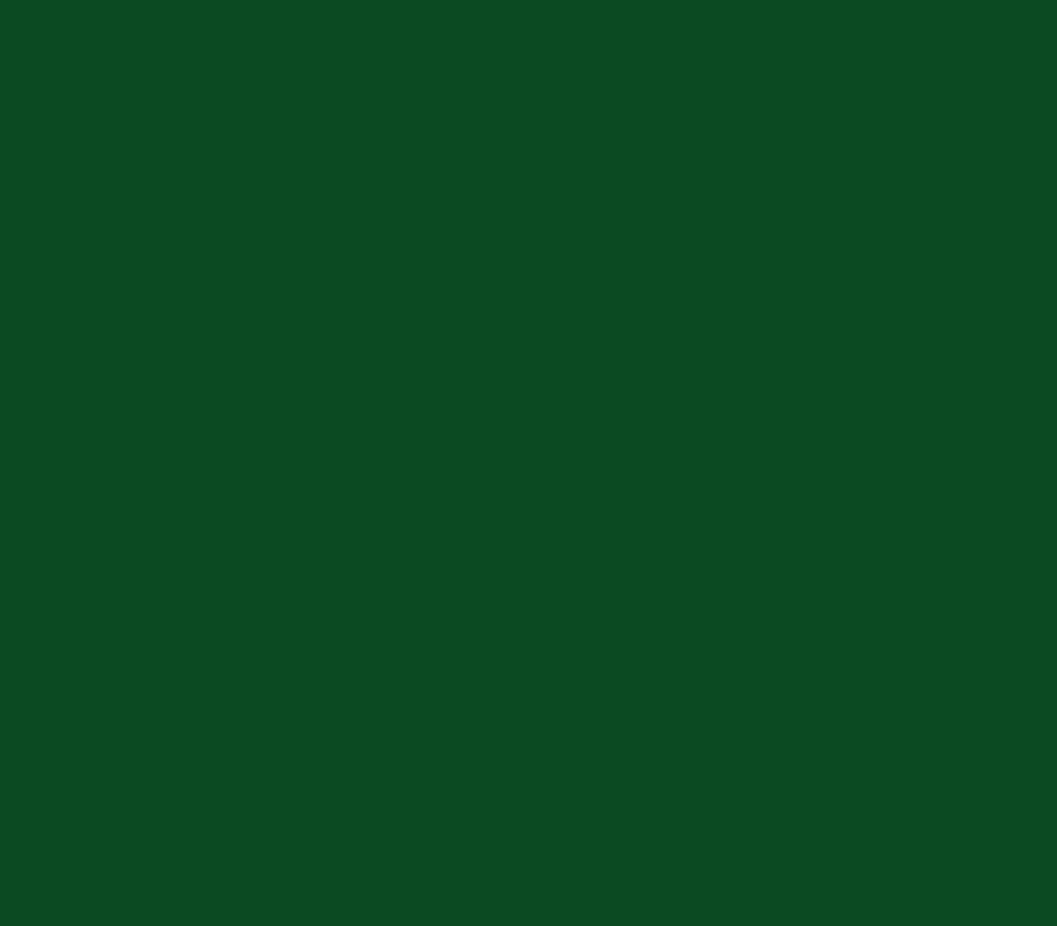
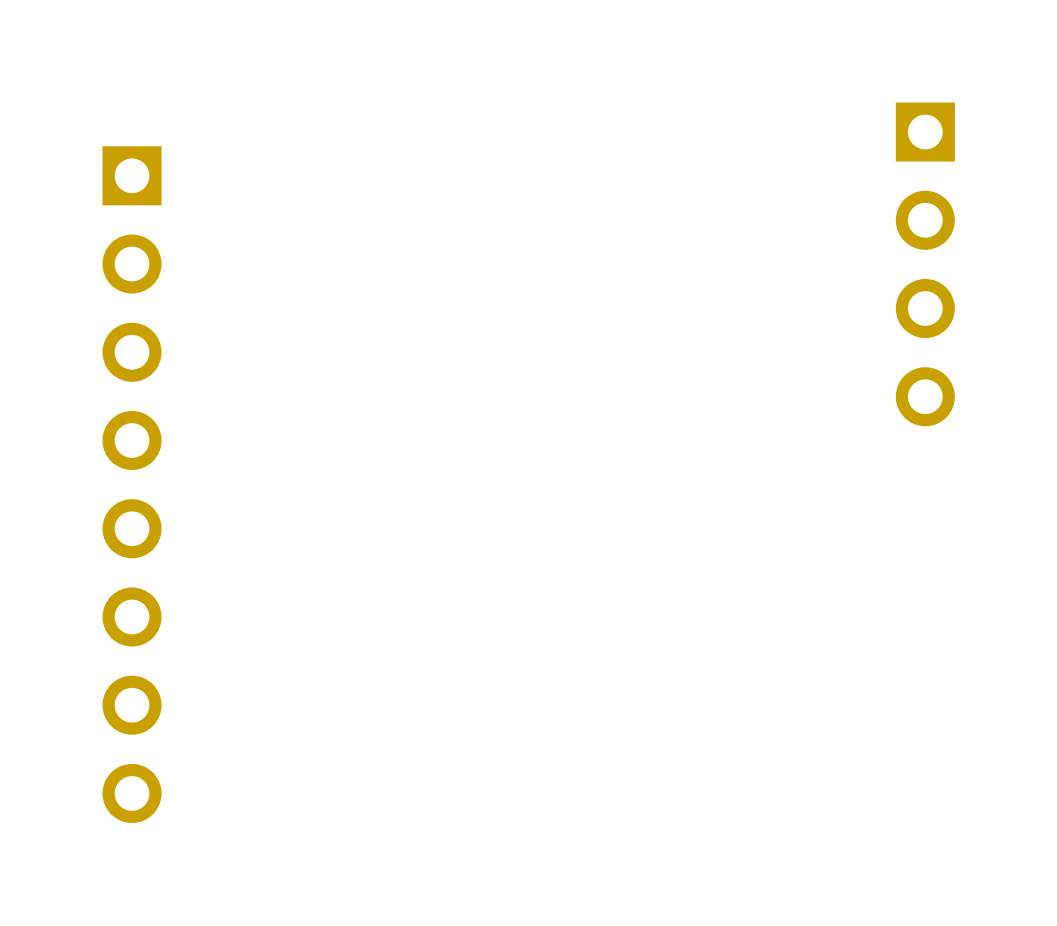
part: none -> (925, 264)
part: none -> (132, 484)

